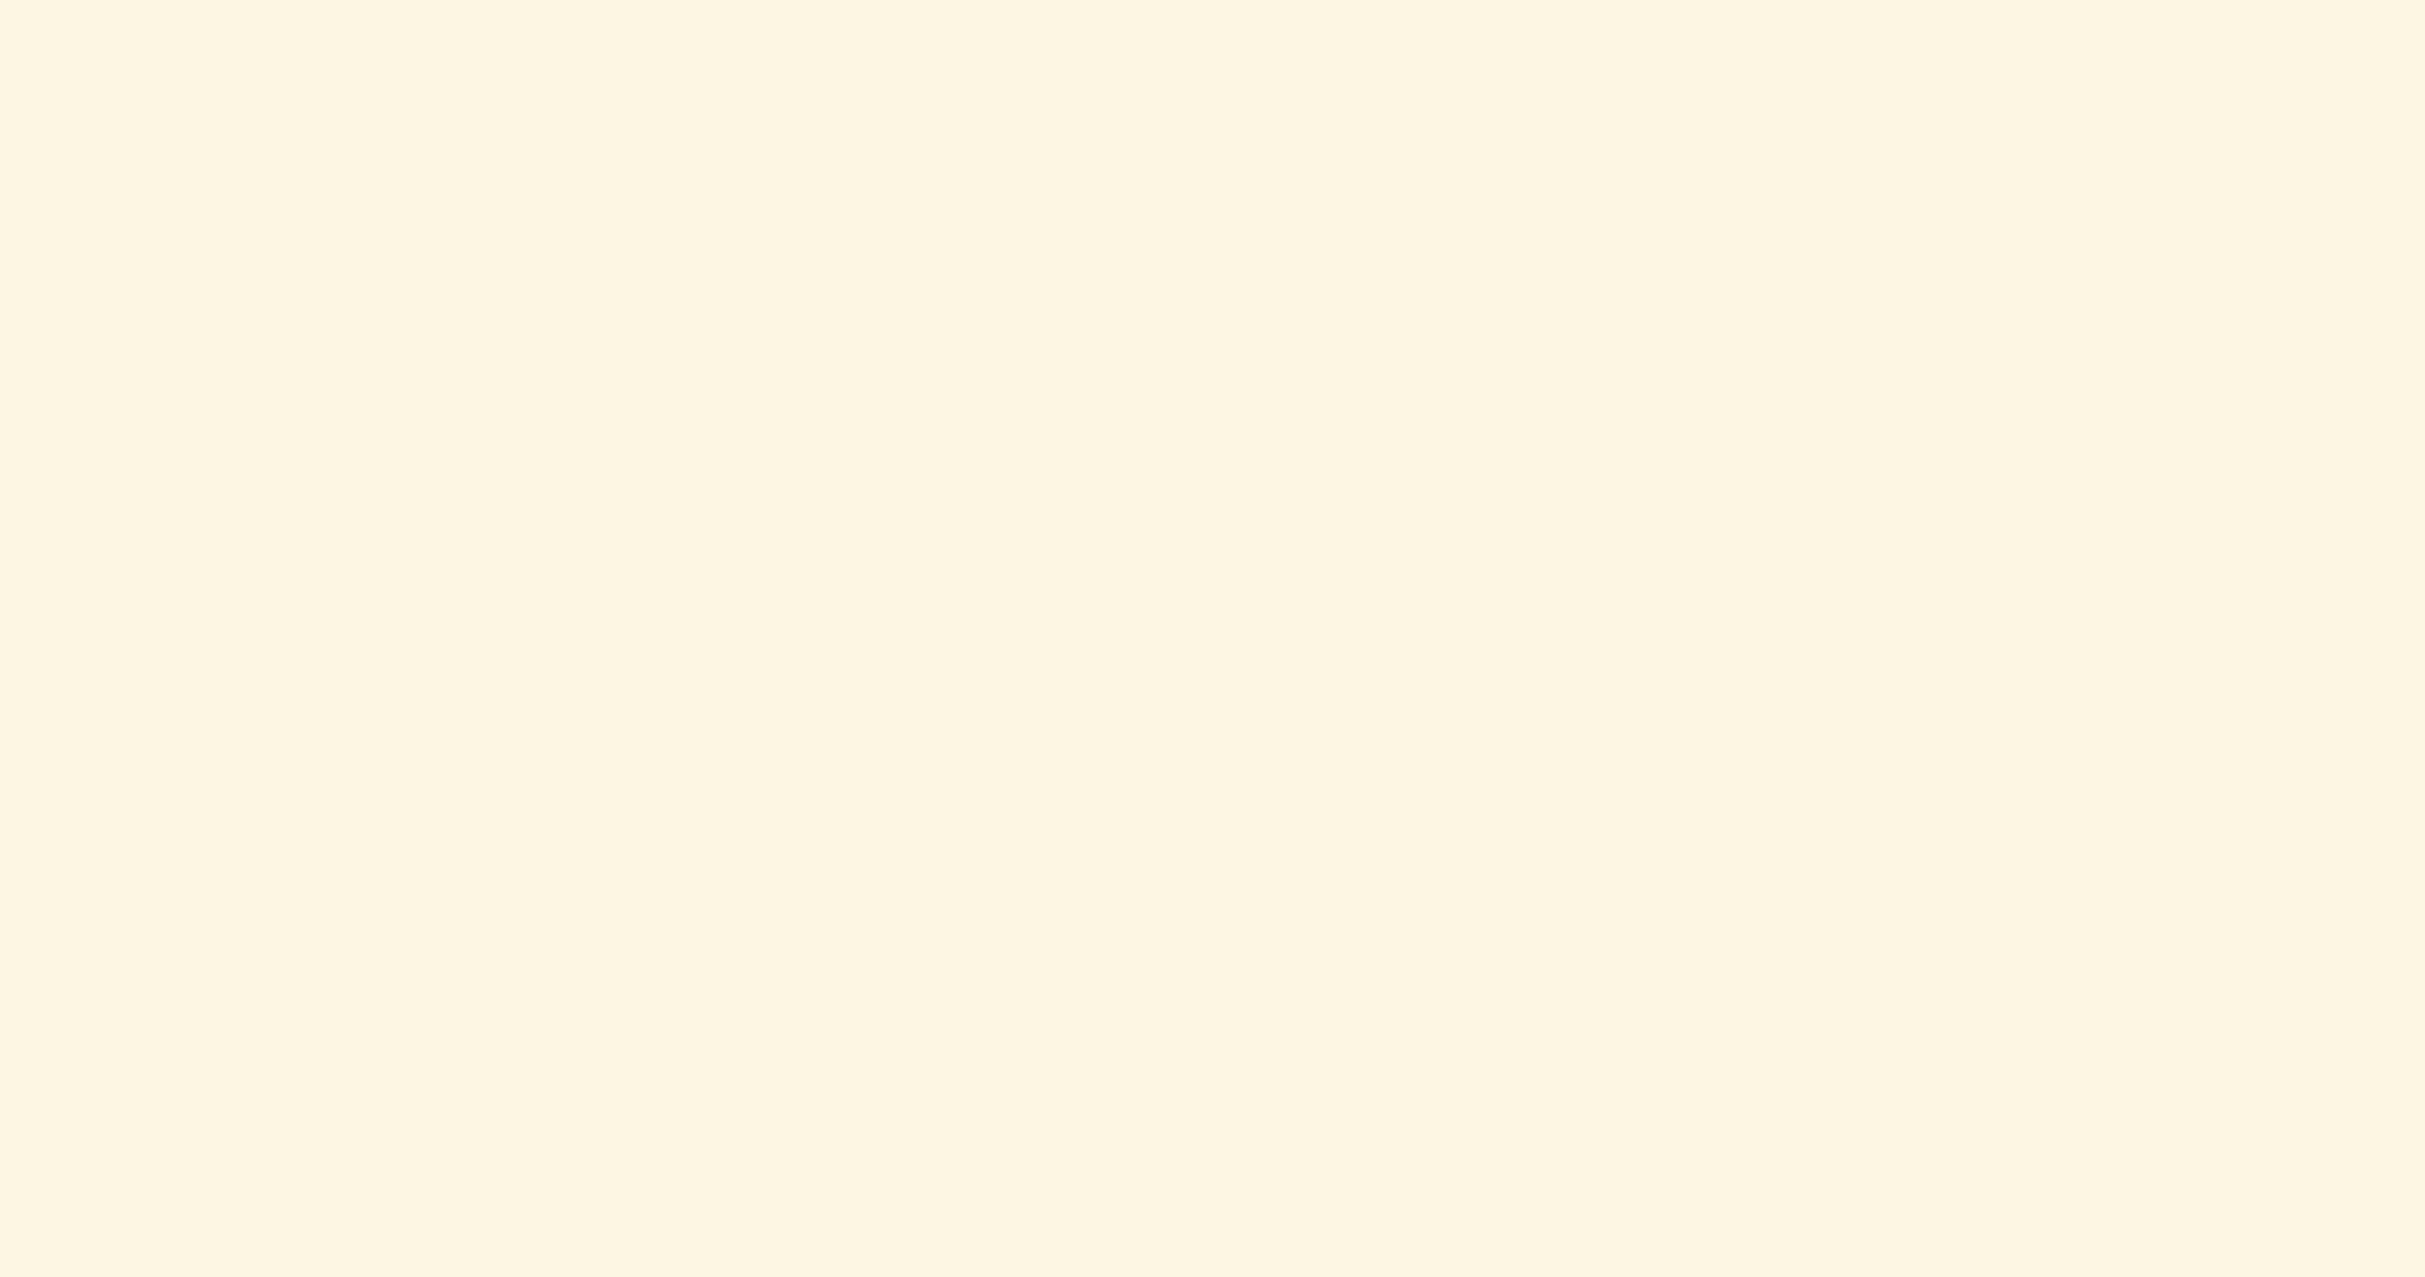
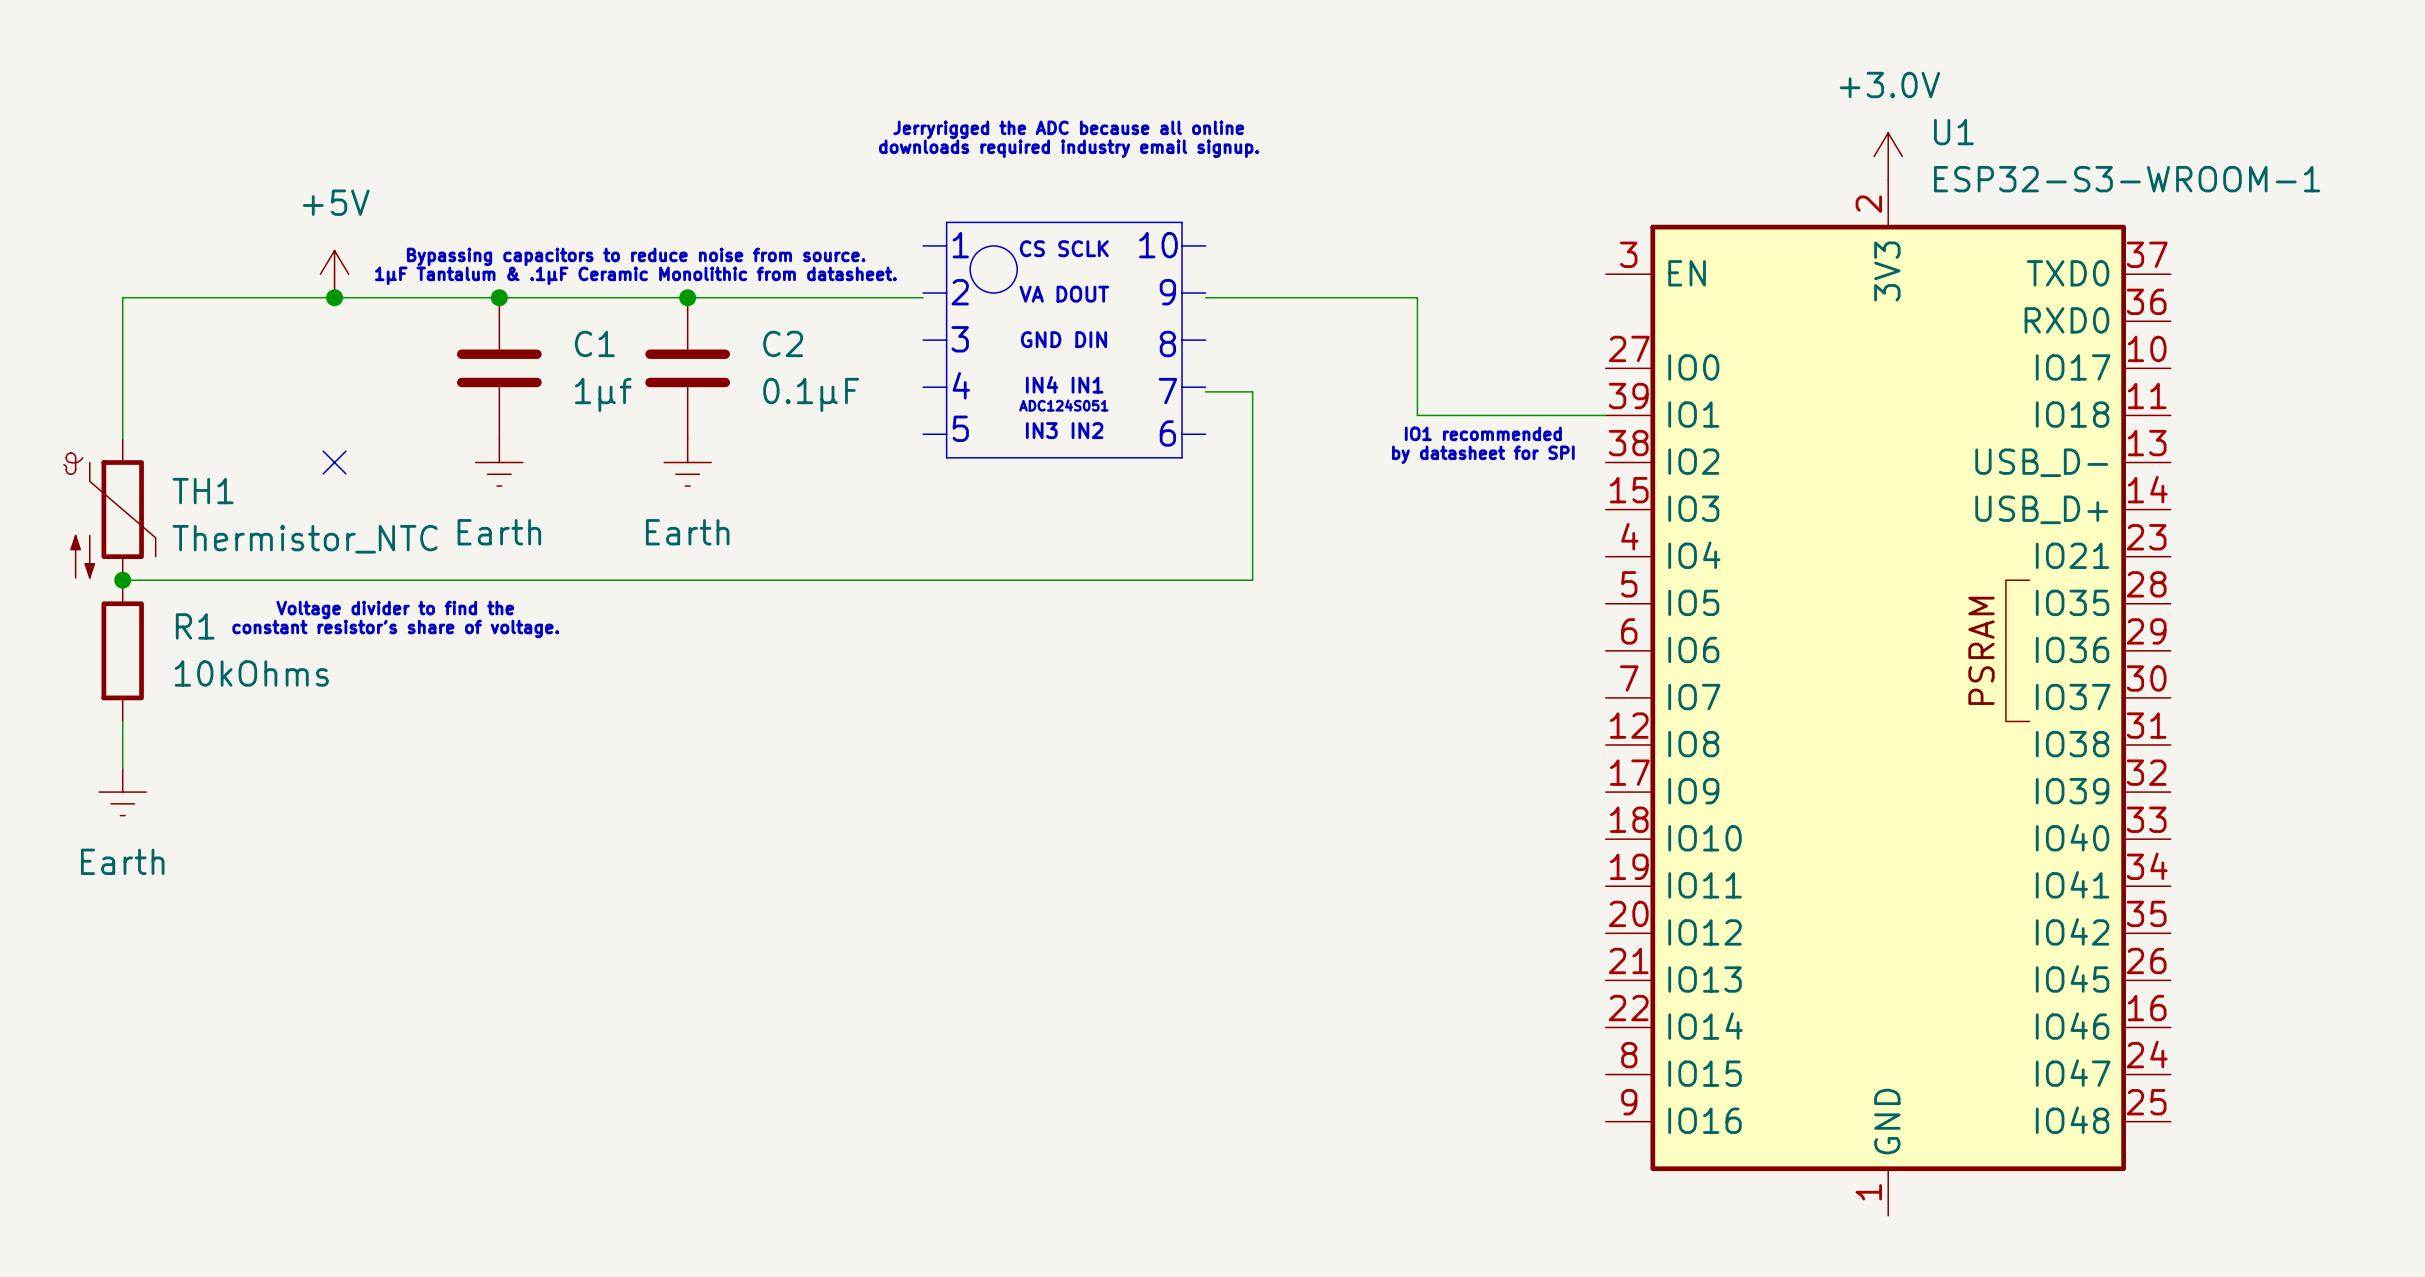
text: none -> Jerryrigged the ADC because all online (1068, 129)
text: none -> downloads required industry email signup. (1069, 148)
power symbol: none -> +3.0V (1888, 156)
line: none -> (946, 222) (1182, 222) (1182, 457) (946, 457) (946, 222)
line: none -> (923, 245) (946, 245)
text: none -> 1 (960, 245)
drawing: none -> [970, 245, 1018, 294]
text: none -> 10 (1158, 245)
line: none -> (1182, 245) (1205, 245)
text: none -> CS SCLK (1064, 248)
text: none -> Bypassing capacitors to reduce noise from source. (636, 256)
power symbol: none -> +5V (334, 274)
text: none -> 1μF Tantalum & .1μF Ceramic Monolithic from datasheet. (635, 275)
text: none -> 2 (960, 292)
text: none -> 9 (1167, 292)
line: none -> (923, 293) (946, 293)
line: none -> (1182, 293) (1205, 293)
text: none -> VA DOUT (1064, 294)
junction: none -> (334, 297)
junction: none -> (499, 297)
junction: none -> (687, 297)
wire: none -> (923, 297) (122, 297) (122, 438)
wire: none -> (1205, 297) (1417, 297) (1417, 415) (1605, 415)
text: none -> 3 (960, 339)
text: none -> GND DIN (1063, 339)
line: none -> (923, 340) (946, 340)
line: none -> (1182, 340) (1205, 340)
text: none -> 8 (1167, 344)
C1: none -> 1μf (499, 368)
C2: none -> 0.1μF (687, 368)
text: none -> IN4 IN1 (1064, 384)
text: none -> 4 (961, 385)
line: none -> (923, 387) (946, 387)
line: none -> (1182, 387) (1205, 387)
text: none -> 7 (1167, 391)
wire: none -> (1205, 391) (1252, 391) (1252, 580) (122, 580)
text: none -> ADC124S051 (1063, 405)
text: none -> 5 (960, 428)
text: none -> IN3 IN2 (1064, 430)
text: none -> 6 (1167, 433)
text: none -> IO1 recommended (1483, 433)
line: none -> (923, 434) (946, 434)
line: none -> (1182, 434) (1205, 434)
text: none -> by datasheet for SPI (1483, 454)
no-connect mark: none -> (334, 462)
power symbol: none -> Earth (499, 462)
power symbol: none -> Earth (687, 462)
TH1: none -> Thermistor_NTC (109, 509)
junction: none -> (122, 580)
text: none -> Voltage divider to find the (395, 610)
text: none -> constant resistor's share of voltage. (395, 628)
R1: none -> 10kOhms (122, 650)
U1: none -> ESP32-S3-WROOM-1 (1888, 697)
wire: none -> (122, 721) (122, 768)
power symbol: none -> Earth (122, 792)

